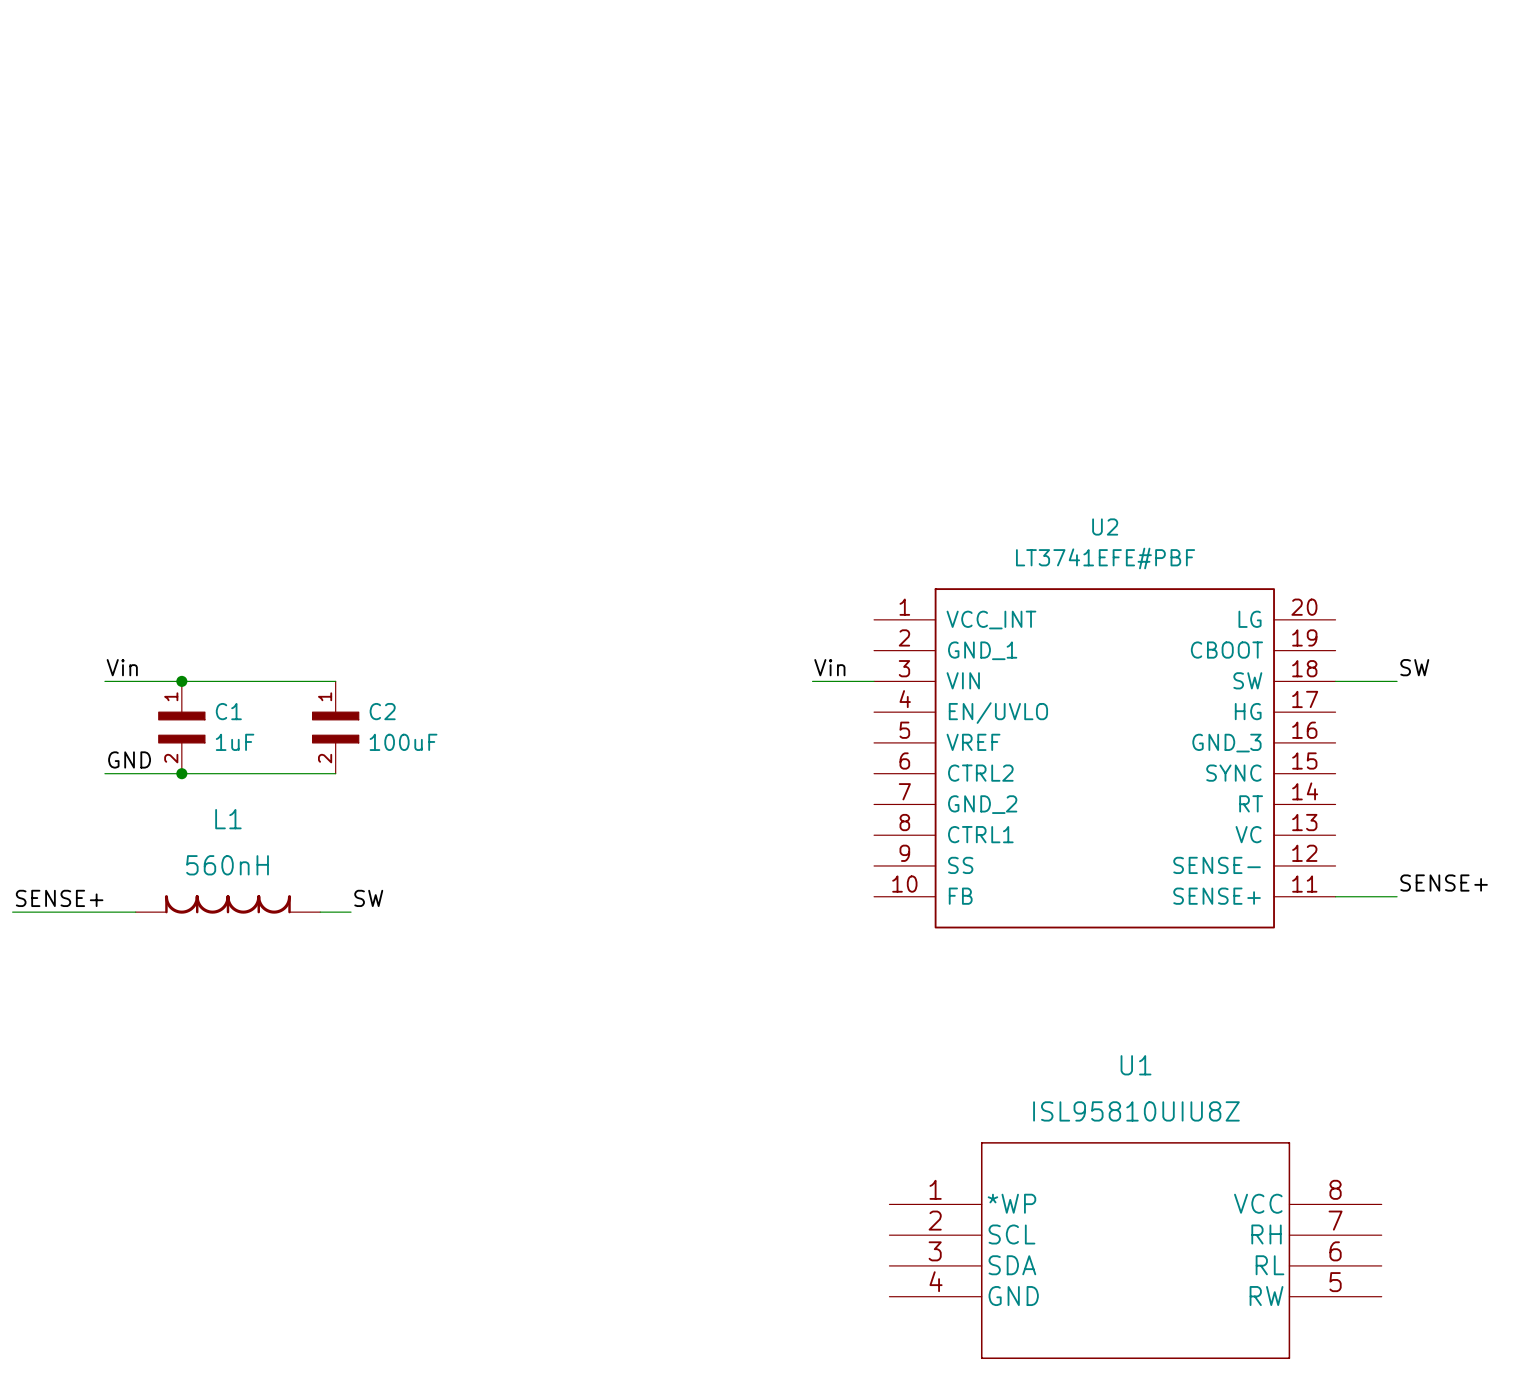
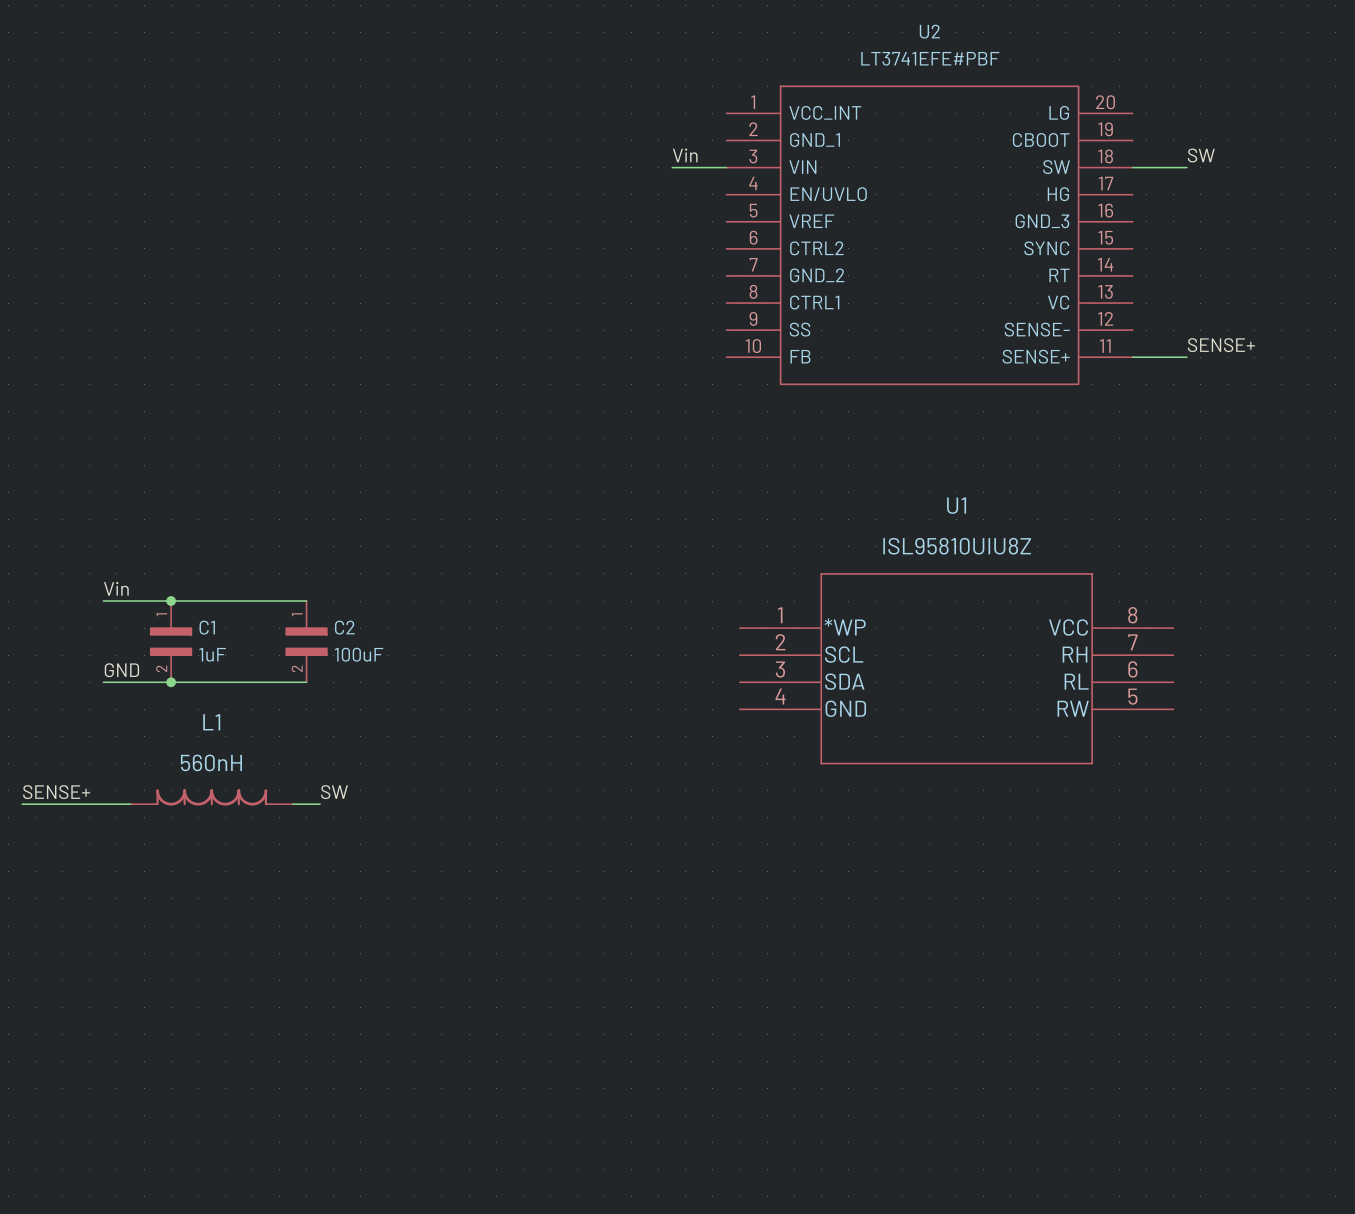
label: none -> Vin (685, 155)
label: none -> SW (1201, 155)
wire: none -> (672, 167) (726, 167)
wire: none -> (1132, 167) (1186, 167)
label: none -> SENSE+ (1221, 345)
label: Vin (829, 667) -> none
label: SW (1414, 667) -> none
wire: (812, 681) (874, 681) -> none
wire: (1335, 681) (1397, 681) -> (1132, 357) (1186, 357)
U2 position: (1104, 758) -> (929, 235)
label: SENSE+ (1444, 883) -> none
wire: (1335, 896) (1397, 896) -> none
U1 position: (1135, 1250) -> (956, 668)

